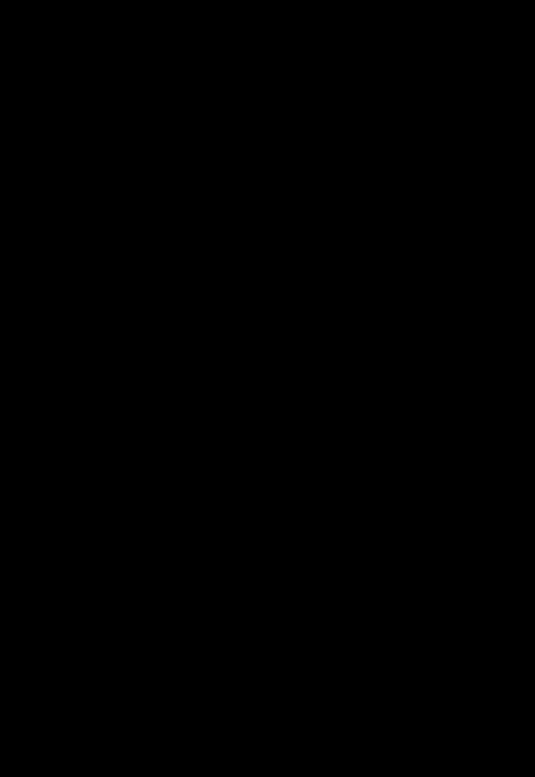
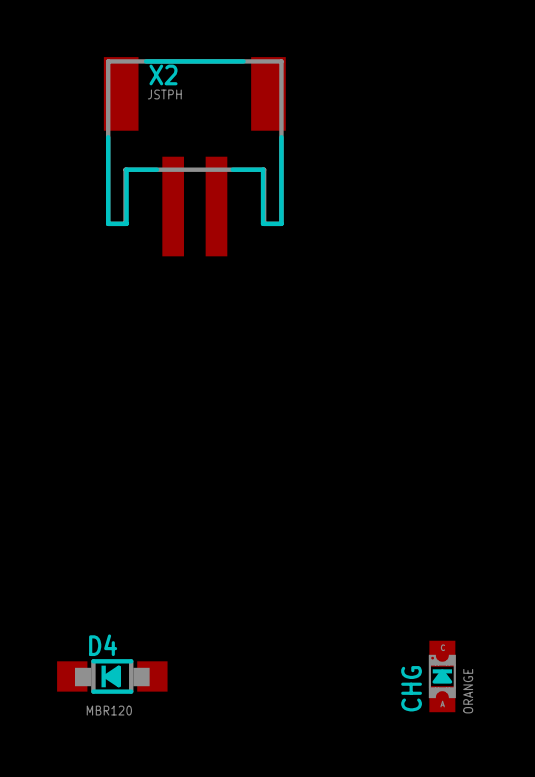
X2: none -> JSTPH (194, 156)
D4: none -> MBR120 (112, 676)
CHG: none -> ORANGE (442, 676)

